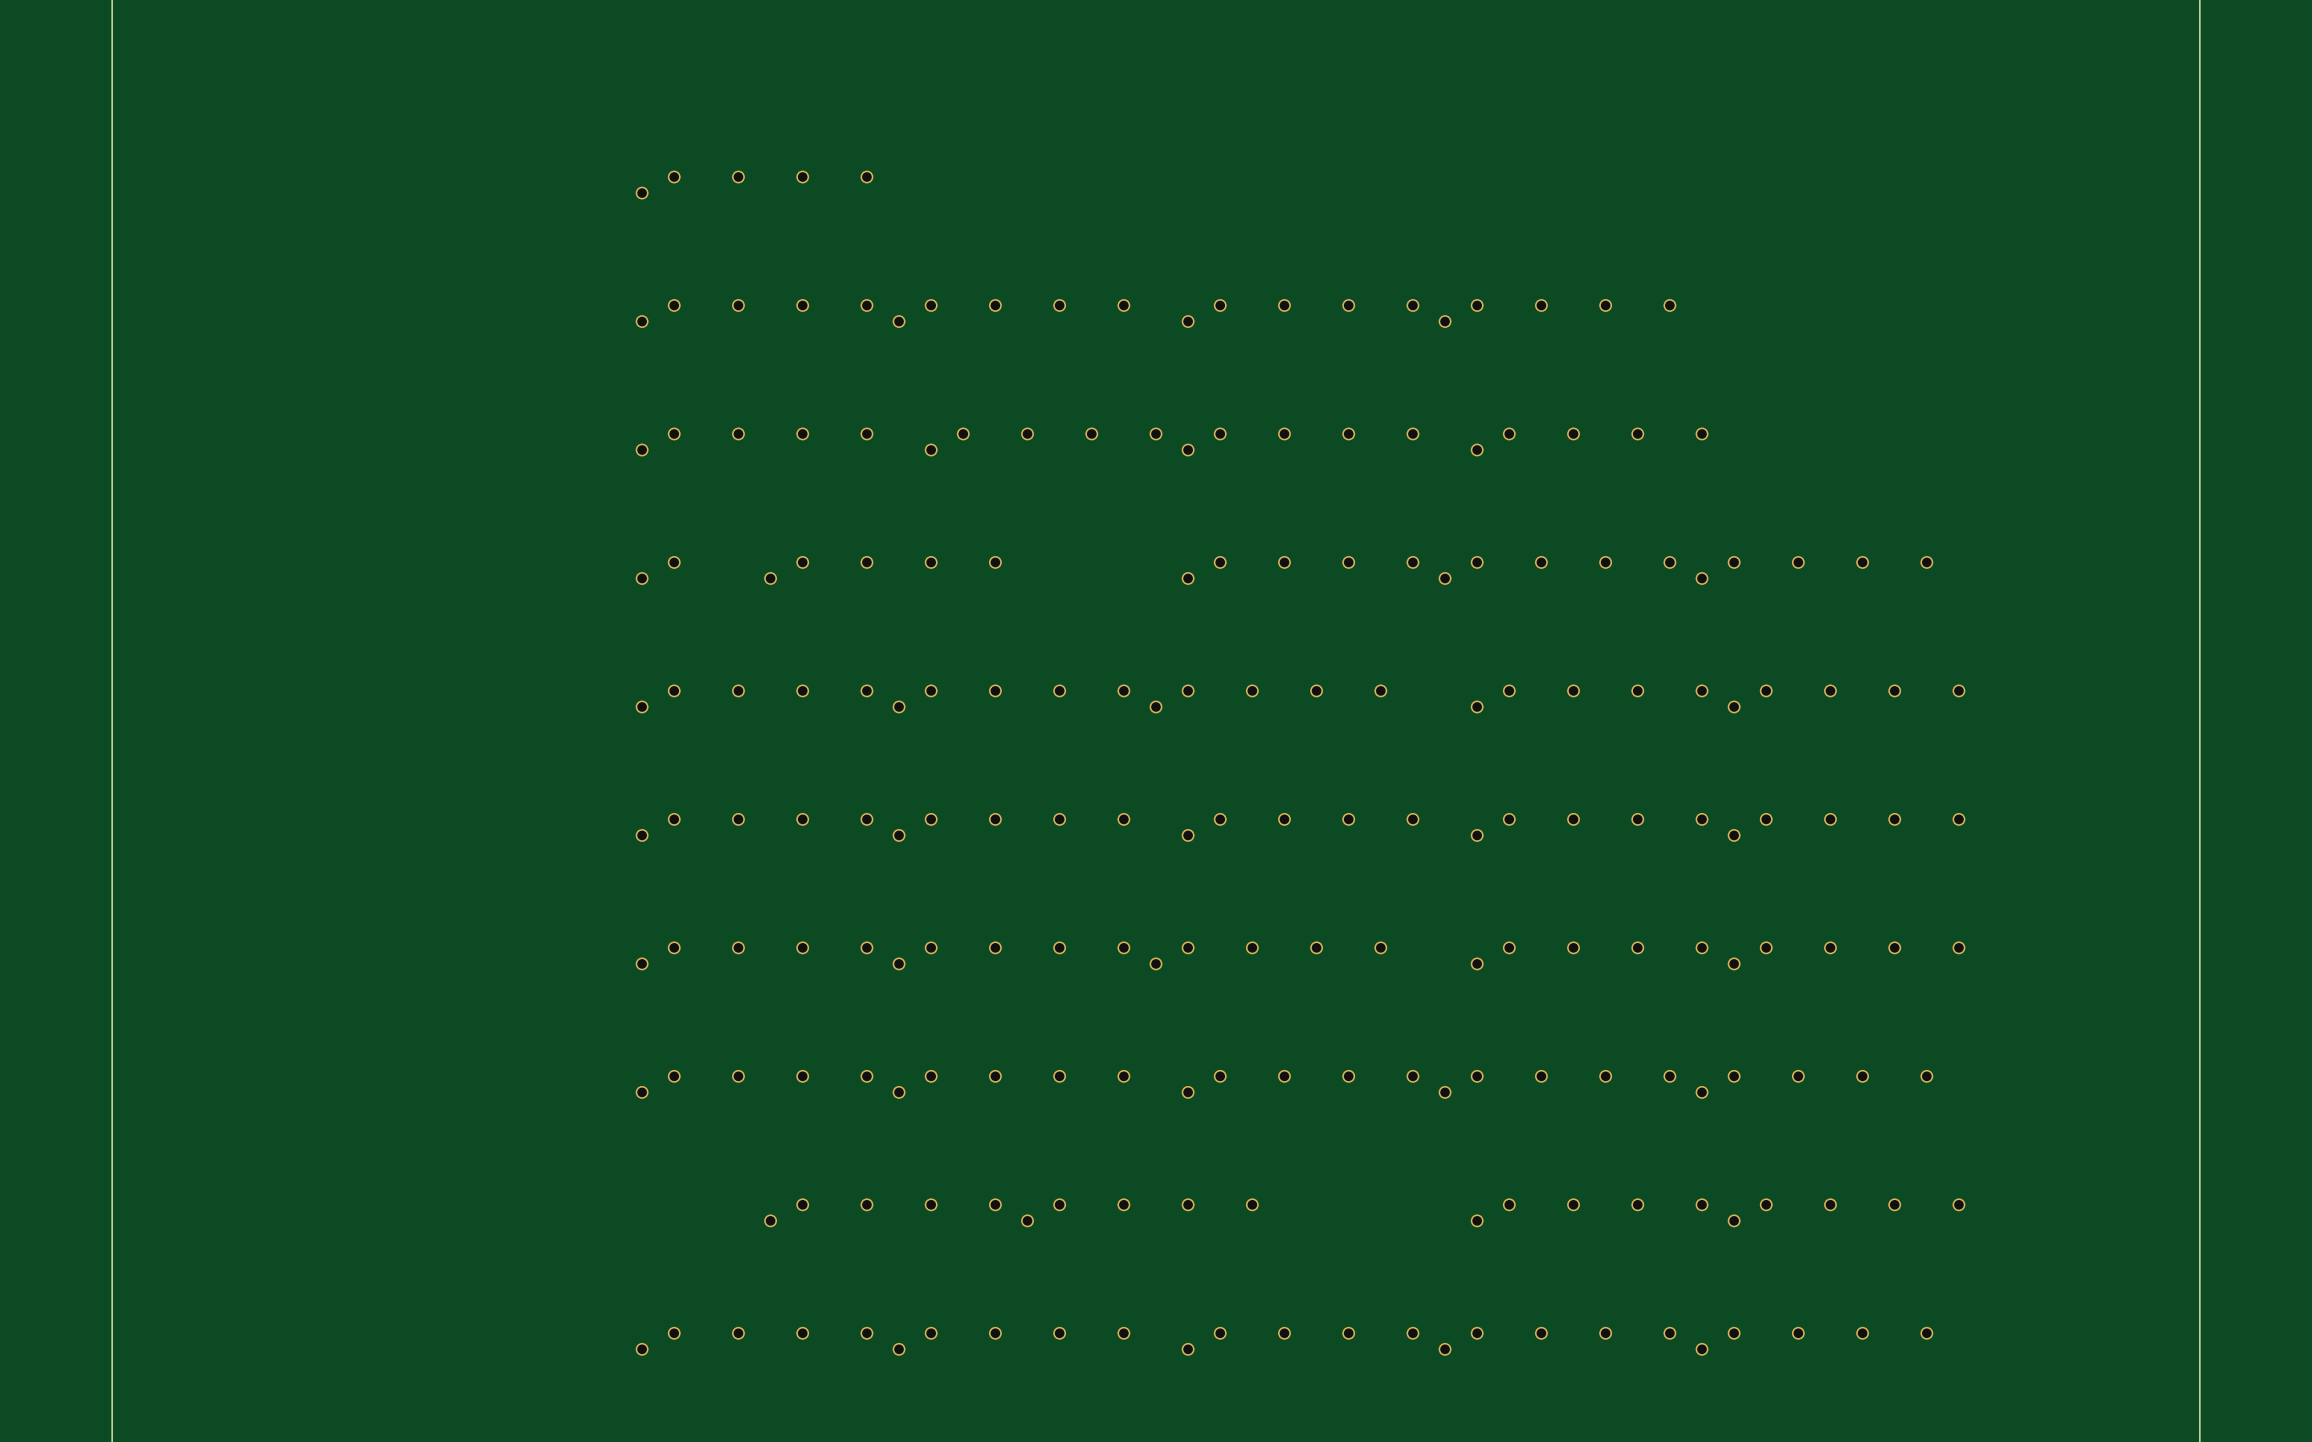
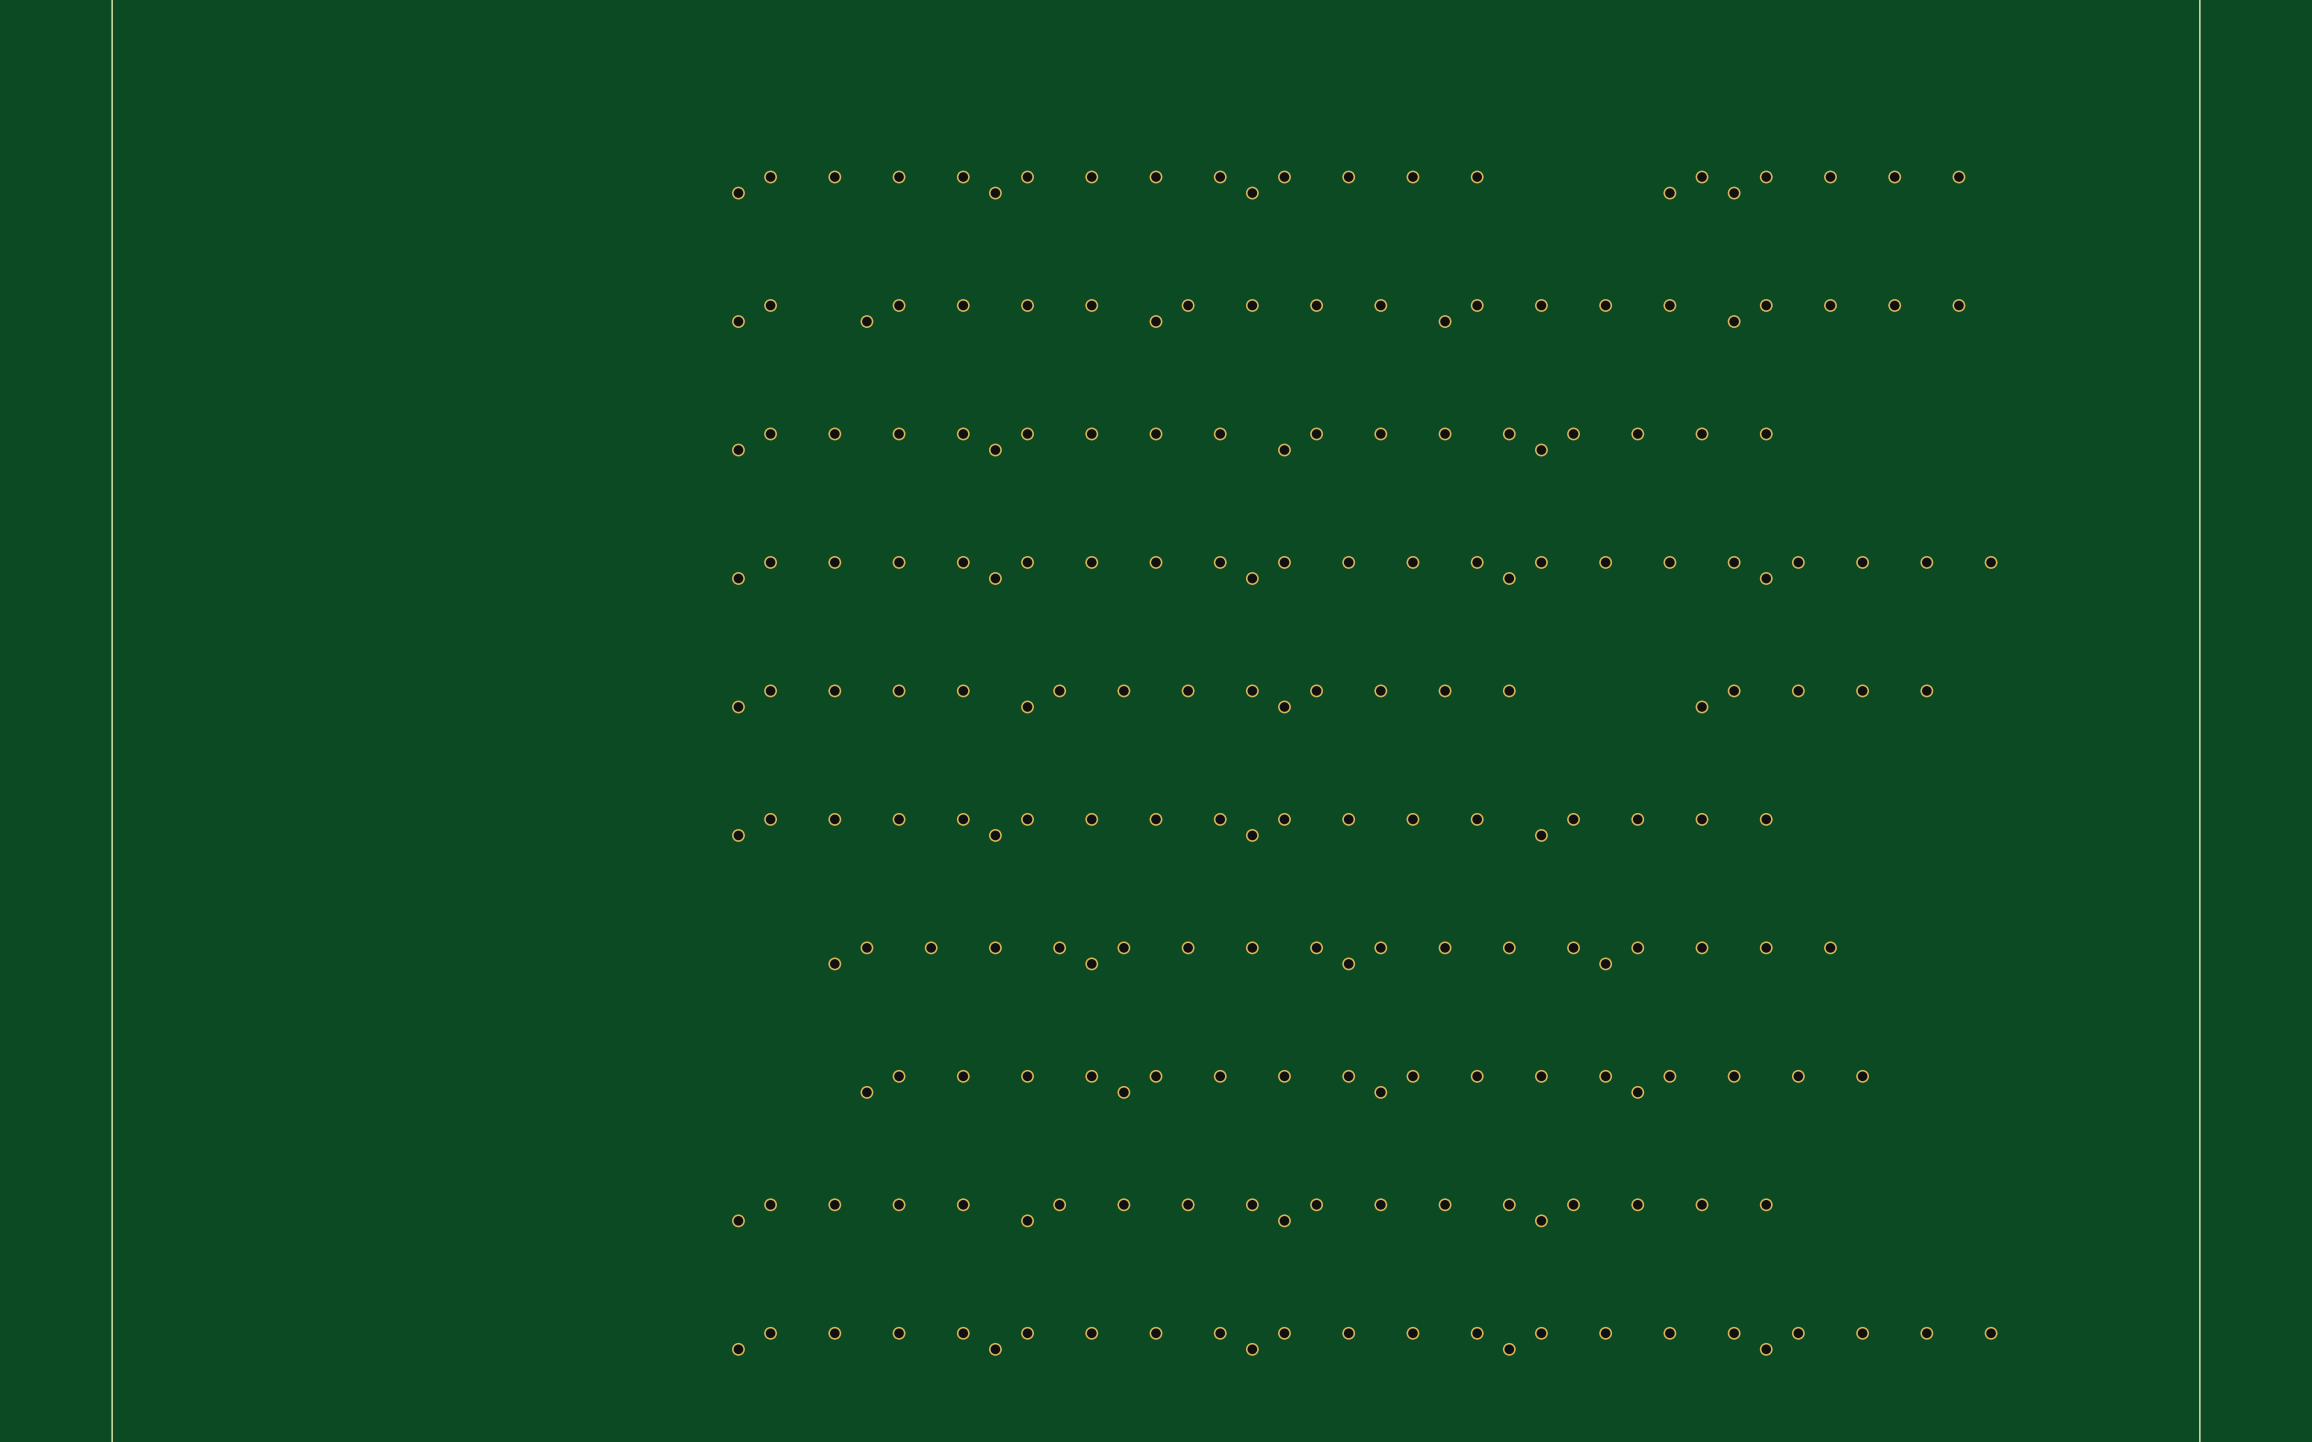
part position: (754, 185) -> (850, 185)
part: none -> (1107, 185)
part: none -> (1364, 185)
part: none -> (1685, 185)
part: none -> (1846, 185)
part footprint: [635, 299, 874, 328] -> [732, 299, 778, 328]
part position: (1011, 313) -> (979, 313)
part position: (1300, 313) -> (1268, 313)
part: none -> (1846, 313)
part: (754, 441) -> none
part: none -> (850, 441)
part position: (1043, 441) -> (1107, 441)
part: (1300, 441) -> none
part: none -> (1396, 441)
part position: (1589, 441) -> (1653, 441)
part: (658, 570) -> none
part position: (882, 570) -> (850, 570)
part: none -> (1107, 570)
part position: (1300, 570) -> (1364, 570)
part position: (1557, 570) -> (1621, 570)
part position: (1814, 570) -> (1878, 570)
part: (754, 698) -> none
part: none -> (850, 698)
part: (1011, 698) -> none
part: none -> (1139, 698)
part: (1268, 698) -> none
part: none -> (1396, 698)
part: (1589, 698) -> none
part position: (1846, 698) -> (1814, 698)
part: (754, 827) -> none
part: none -> (850, 827)
part: (1011, 827) -> none
part: none -> (1107, 827)
part position: (1300, 827) -> (1364, 827)
part position: (1589, 827) -> (1653, 827)
part: (1846, 827) -> none
part: (754, 955) -> none
part position: (1011, 955) -> (947, 955)
part position: (1268, 955) -> (1204, 955)
part: none -> (1461, 955)
part: (1589, 955) -> none
part: none -> (1718, 955)
part: (1846, 955) -> none
part: (754, 1084) -> none
part position: (1011, 1084) -> (979, 1084)
part position: (1300, 1084) -> (1236, 1084)
part position: (1557, 1084) -> (1493, 1084)
part position: (1814, 1084) -> (1750, 1084)
part position: (882, 1212) -> (850, 1212)
part: none -> (1396, 1212)
part position: (1589, 1212) -> (1653, 1212)
part: (1846, 1212) -> none
part: (754, 1341) -> none
part: none -> (850, 1341)
part: (1011, 1341) -> none
part: none -> (1107, 1341)
part position: (1300, 1341) -> (1364, 1341)
part position: (1557, 1341) -> (1621, 1341)
part position: (1814, 1341) -> (1878, 1341)

